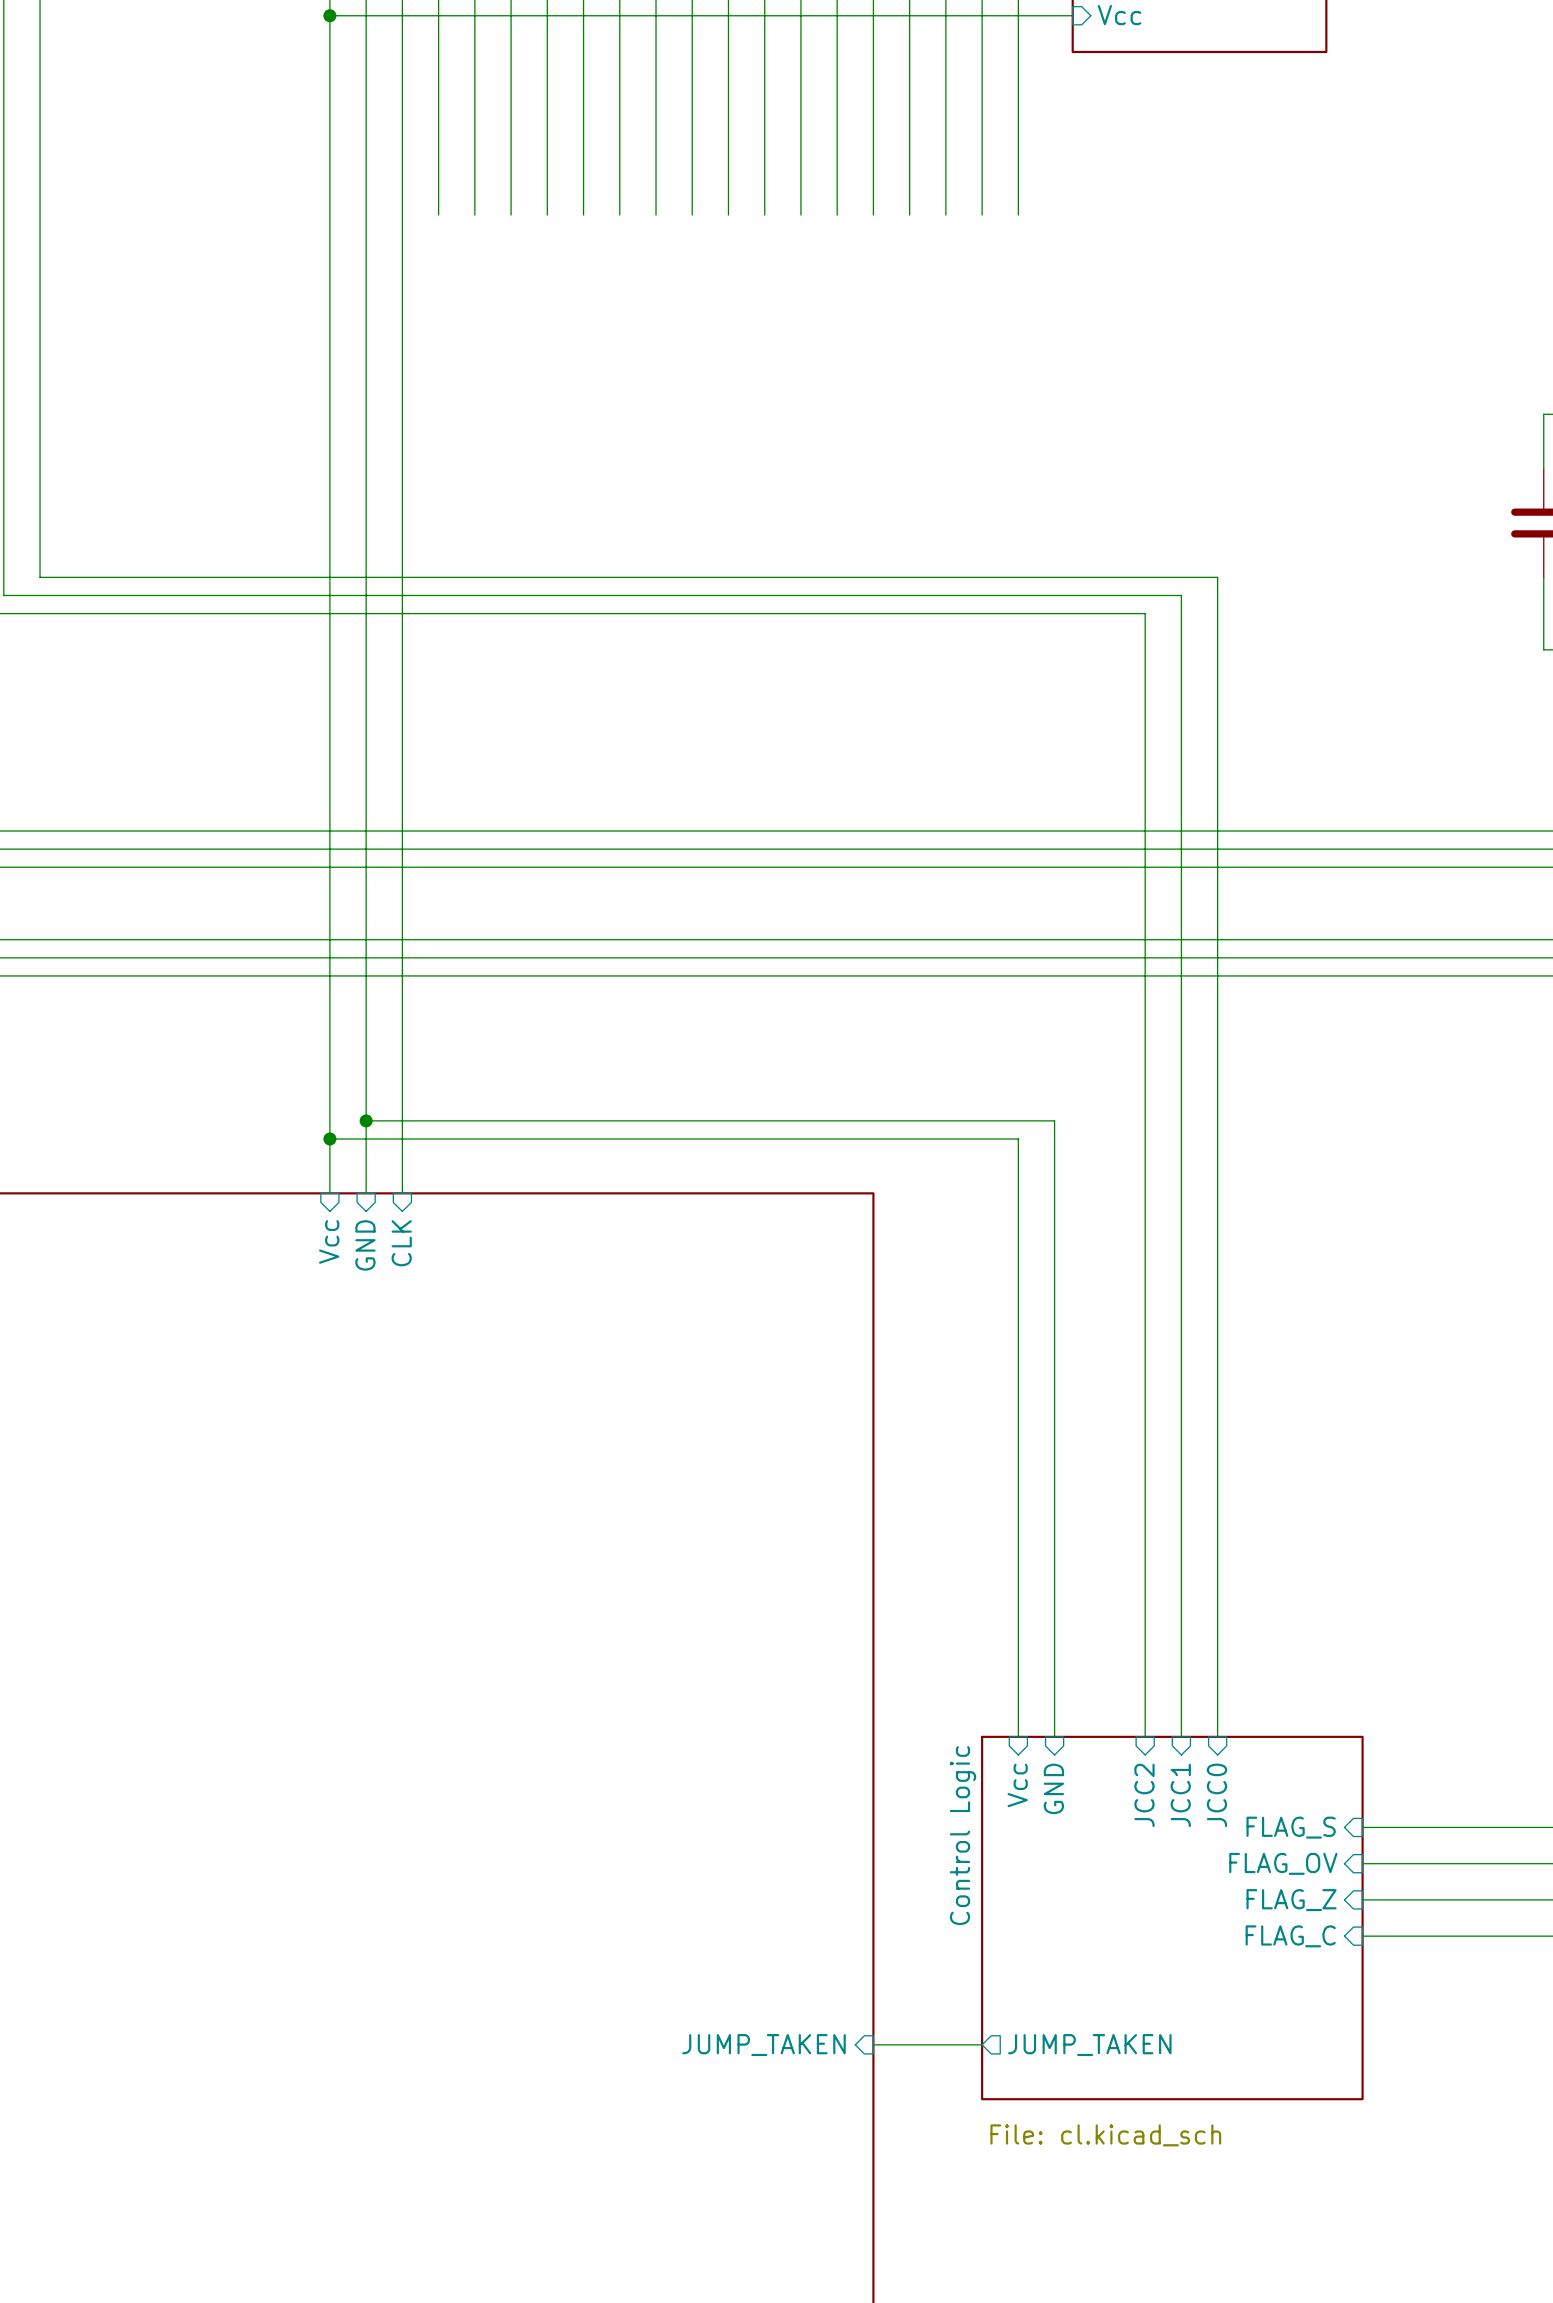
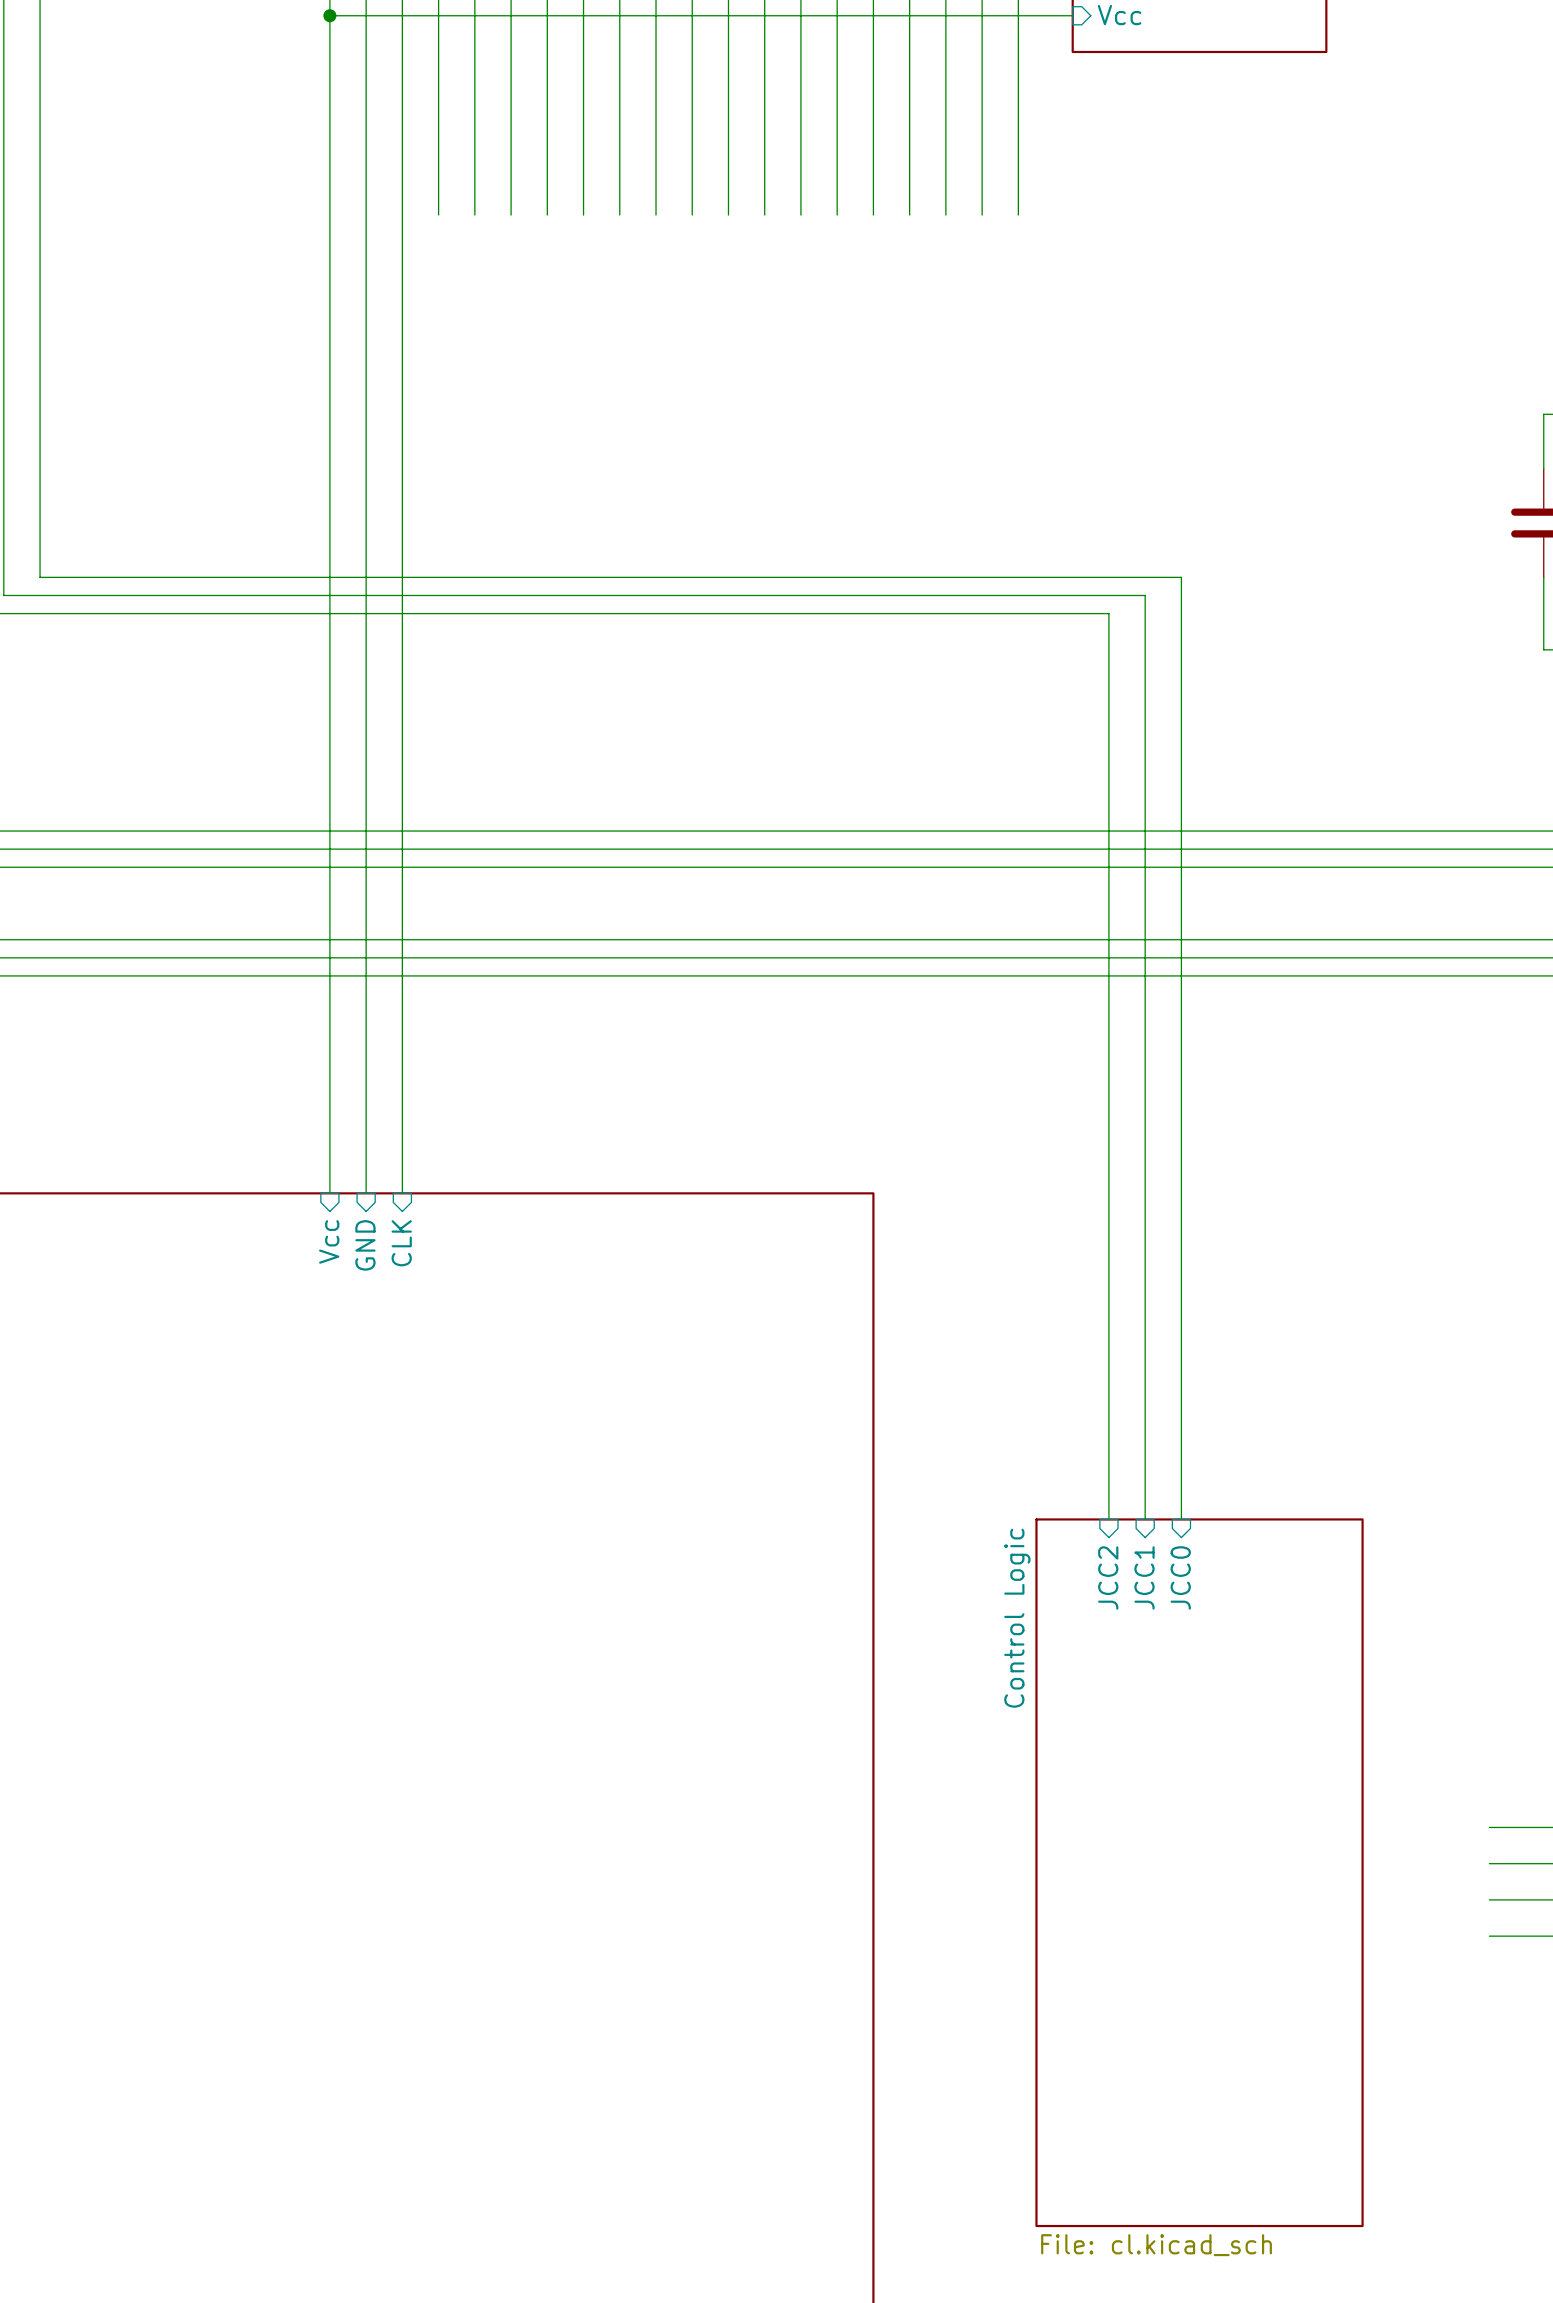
wire: (1181, 577) (1217, 577) (1217, 1736) -> none
wire: (1145, 595) (1181, 595) -> (1181, 577) (1181, 595)
wire: (1108, 613) (1145, 613) -> (1145, 595) (1145, 613)
wire: none -> (1108, 613) (1108, 1519)
wire: (366, 1120) (1054, 1120) (1054, 1736) -> none
junction: (366, 1120) -> none
wire: (329, 1139) (1018, 1139) (1018, 1736) -> none
junction: (329, 1139) -> none
wire: (1145, 1519) (1145, 1736) -> none
wire: (1181, 1519) (1181, 1736) -> none
sheet pin: Vcc (1017, 1785) -> none
sheet pin: GND (1053, 1788) -> none
sheet pin position: JCC2 (1144, 1795) -> JCC2 (1108, 1577)
sheet pin position: JCC1 (1180, 1795) -> JCC1 (1144, 1577)
sheet pin position: JCC0 (1216, 1795) -> JCC0 (1180, 1577)
sheet pin: FLAG_S (1291, 1827) -> none
wire: (1362, 1827) (1489, 1827) -> none
sheet pin: FLAG_OV (1283, 1863) -> none
wire: (1362, 1863) (1489, 1863) -> none
sheet Control Logic: none -> File: cl.kicad_sch (1199, 1872)
wire: (1362, 1899) (1489, 1899) -> none
sheet pin: FLAG_Z (1291, 1900) -> none
sheet Control Logic: File: cl.kicad_sch (1172, 1918) -> none
sheet pin: FLAG_C (1290, 1936) -> none
wire: (1362, 1936) (1489, 1936) -> none
wire: (873, 2044) (982, 2044) -> none
sheet pin: JUMP_TAKEN (764, 2045) -> none
sheet pin: JUMP_TAKEN (1089, 2045) -> none

